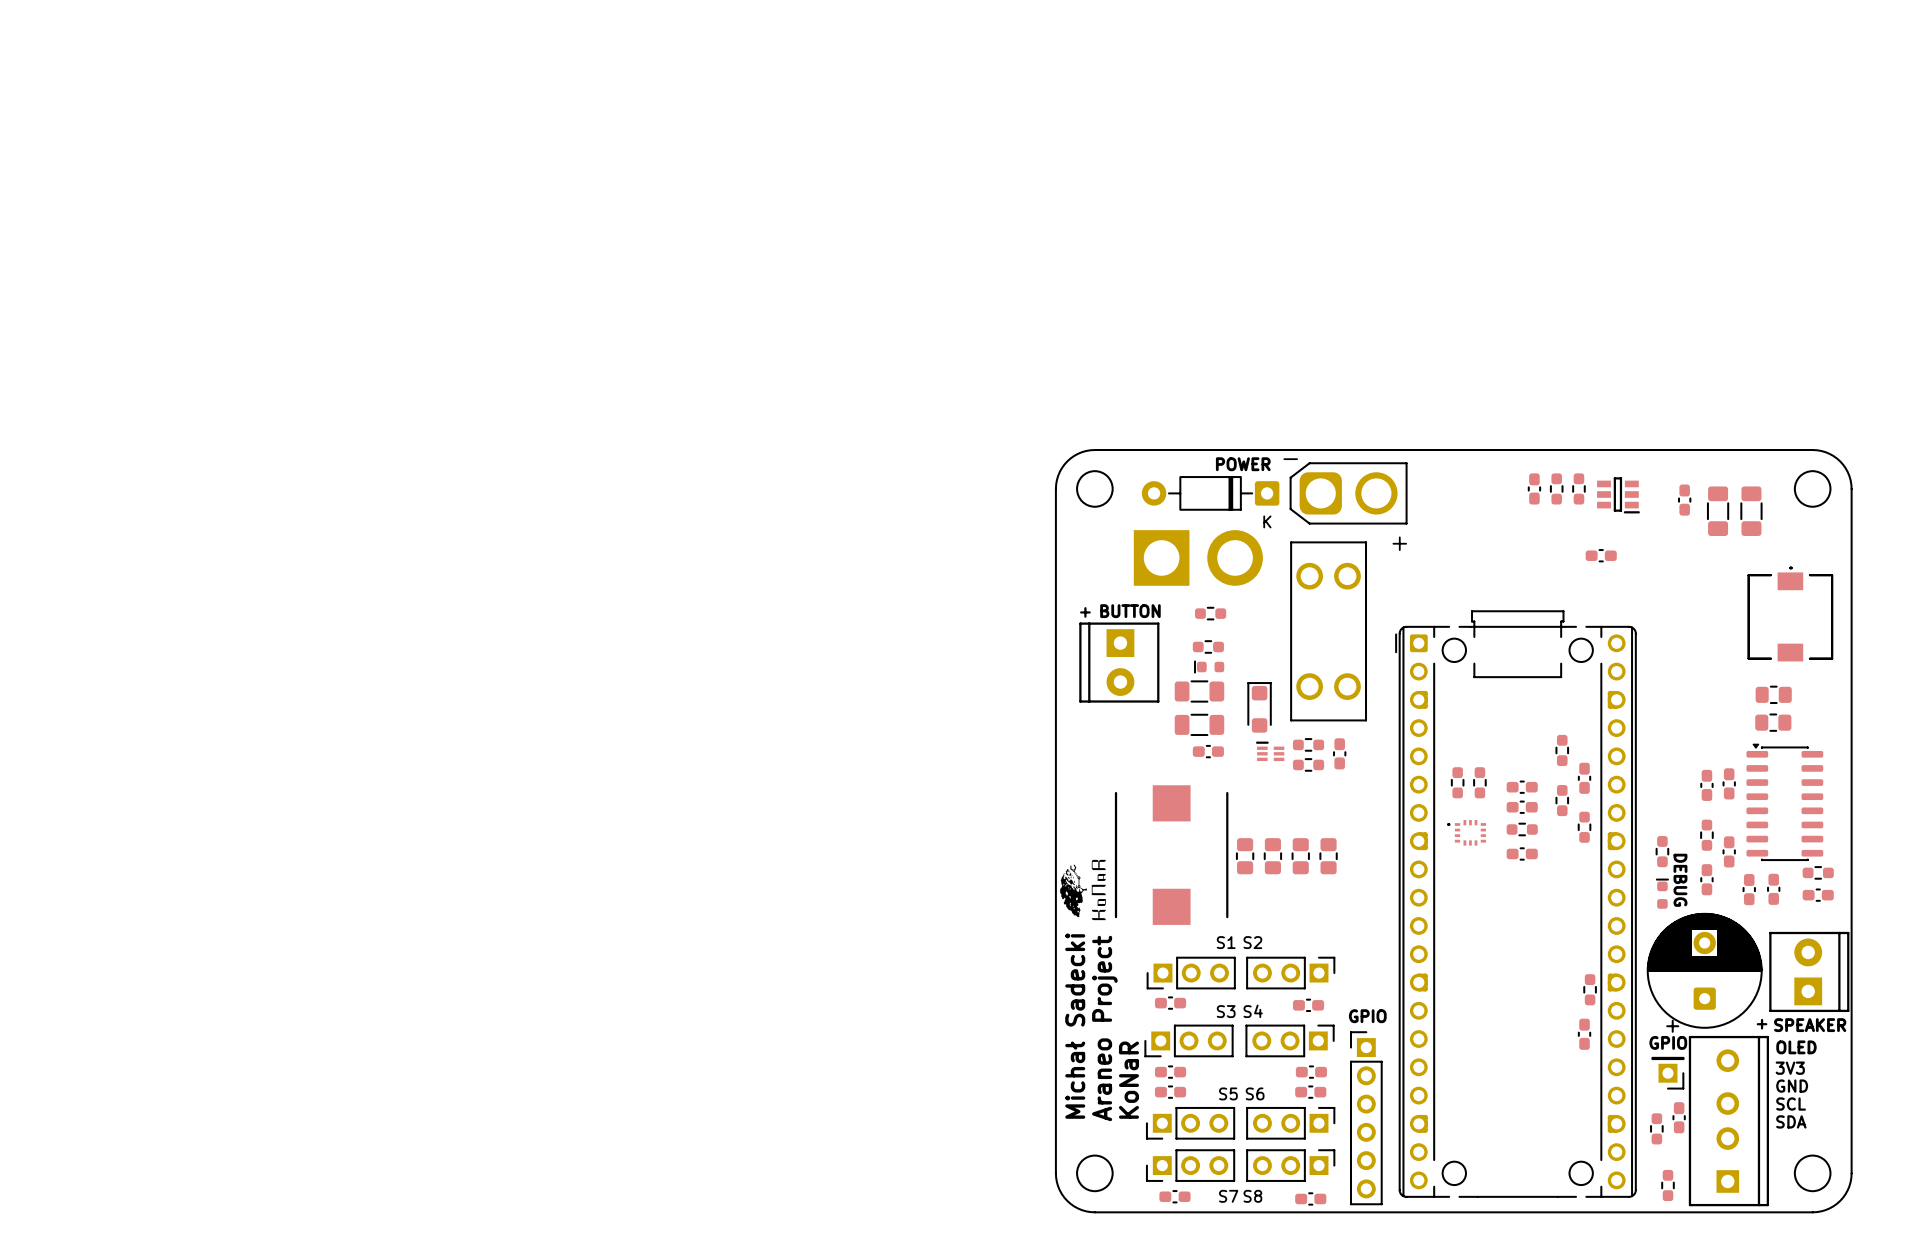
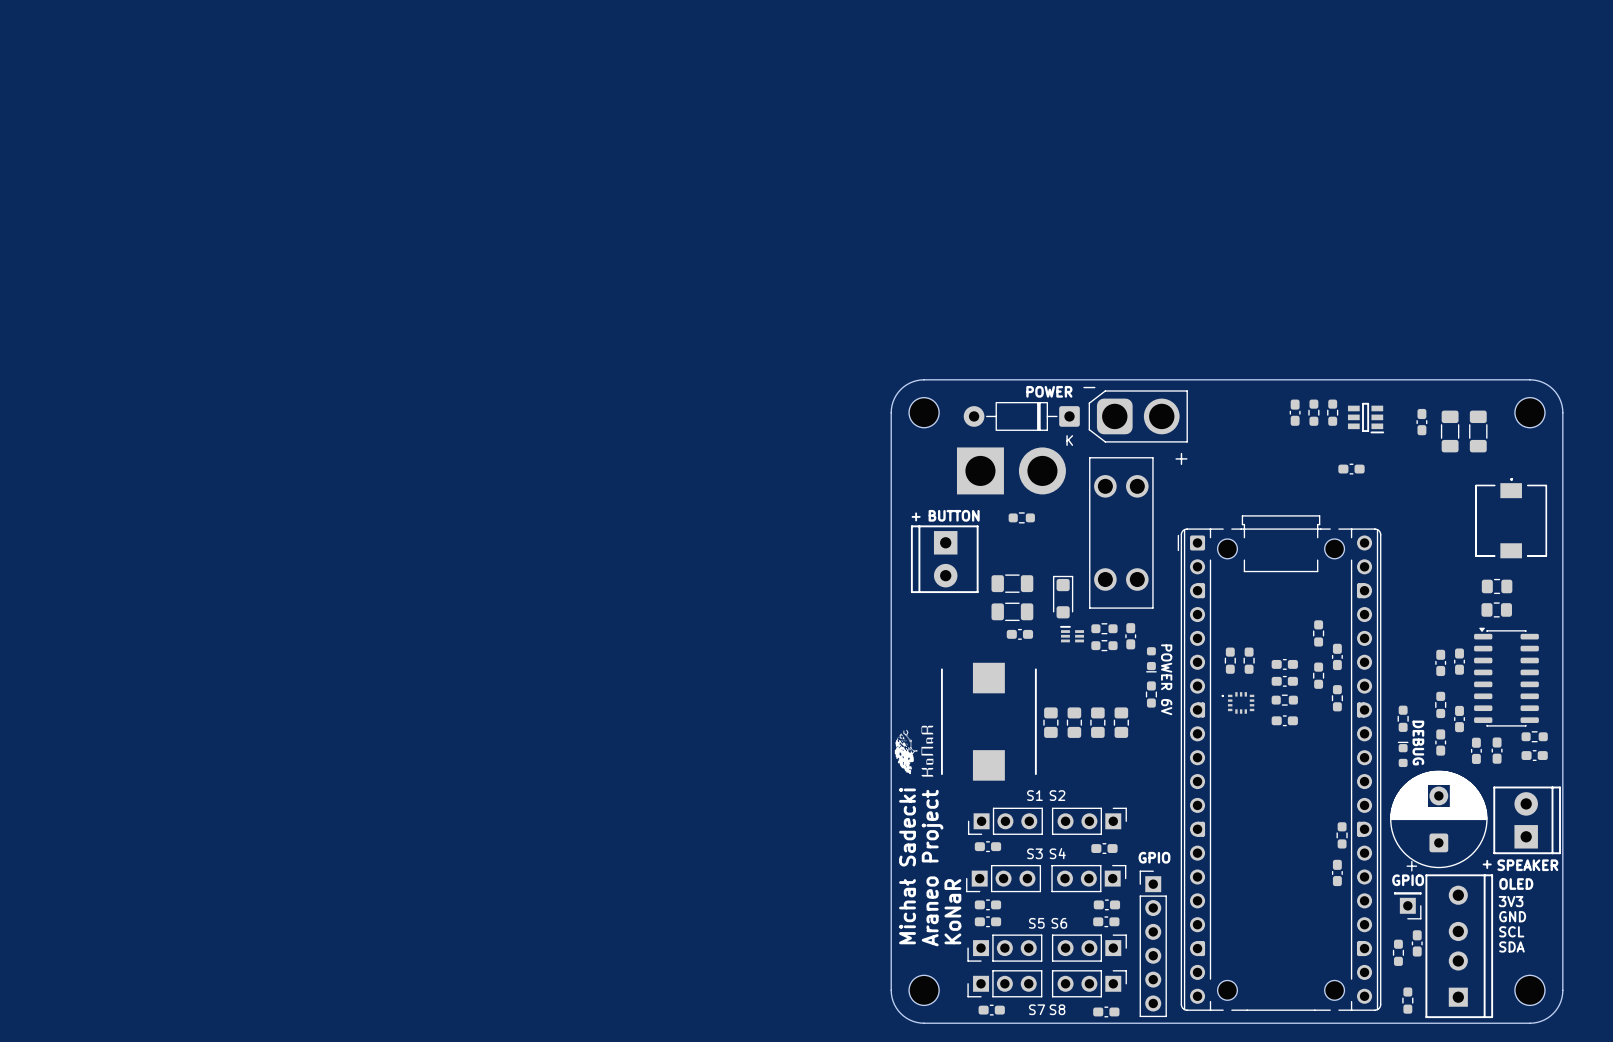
part rotation: 0° (1208, 646) -> 90° clockwise (1151, 694)
part position: (1208, 646) -> (1151, 694)
part rotation: 0° (1209, 667) -> 90° counterclockwise (1151, 659)
part position: (1209, 667) -> (1151, 659)
text: none -> POWER 6V (1166, 679)

